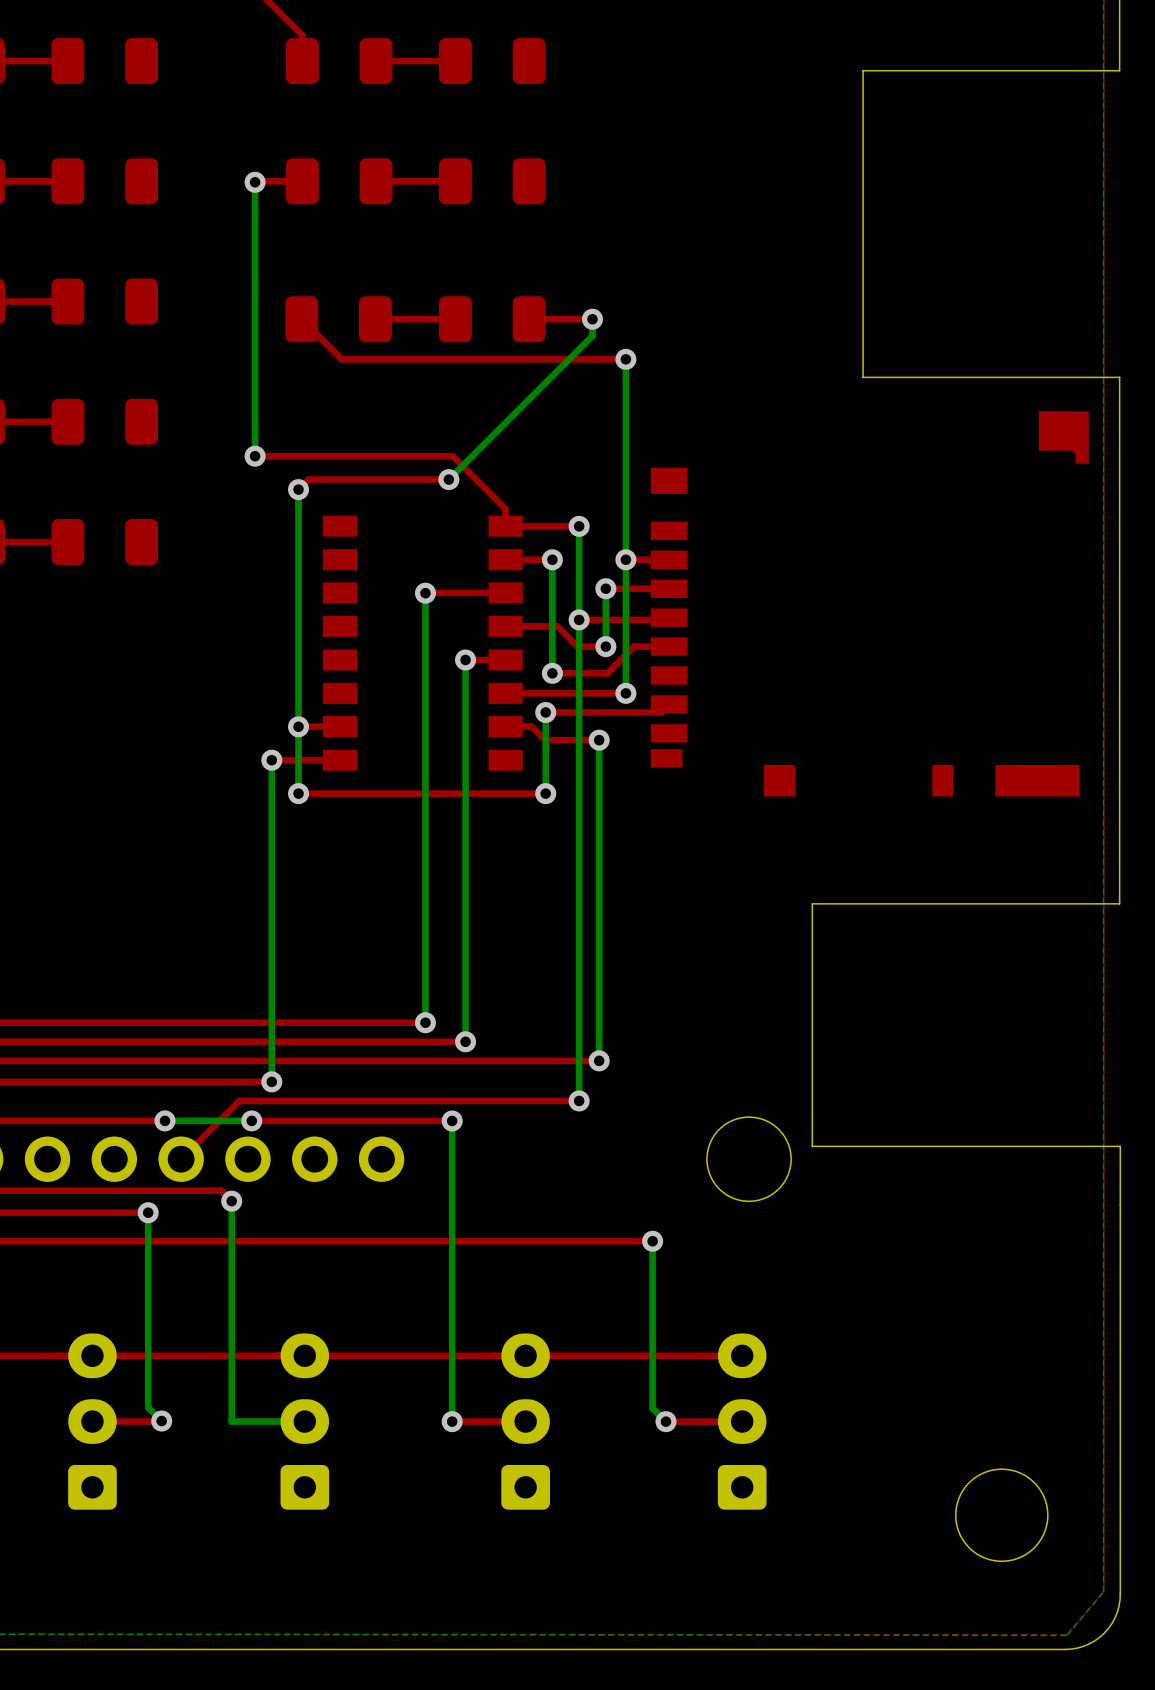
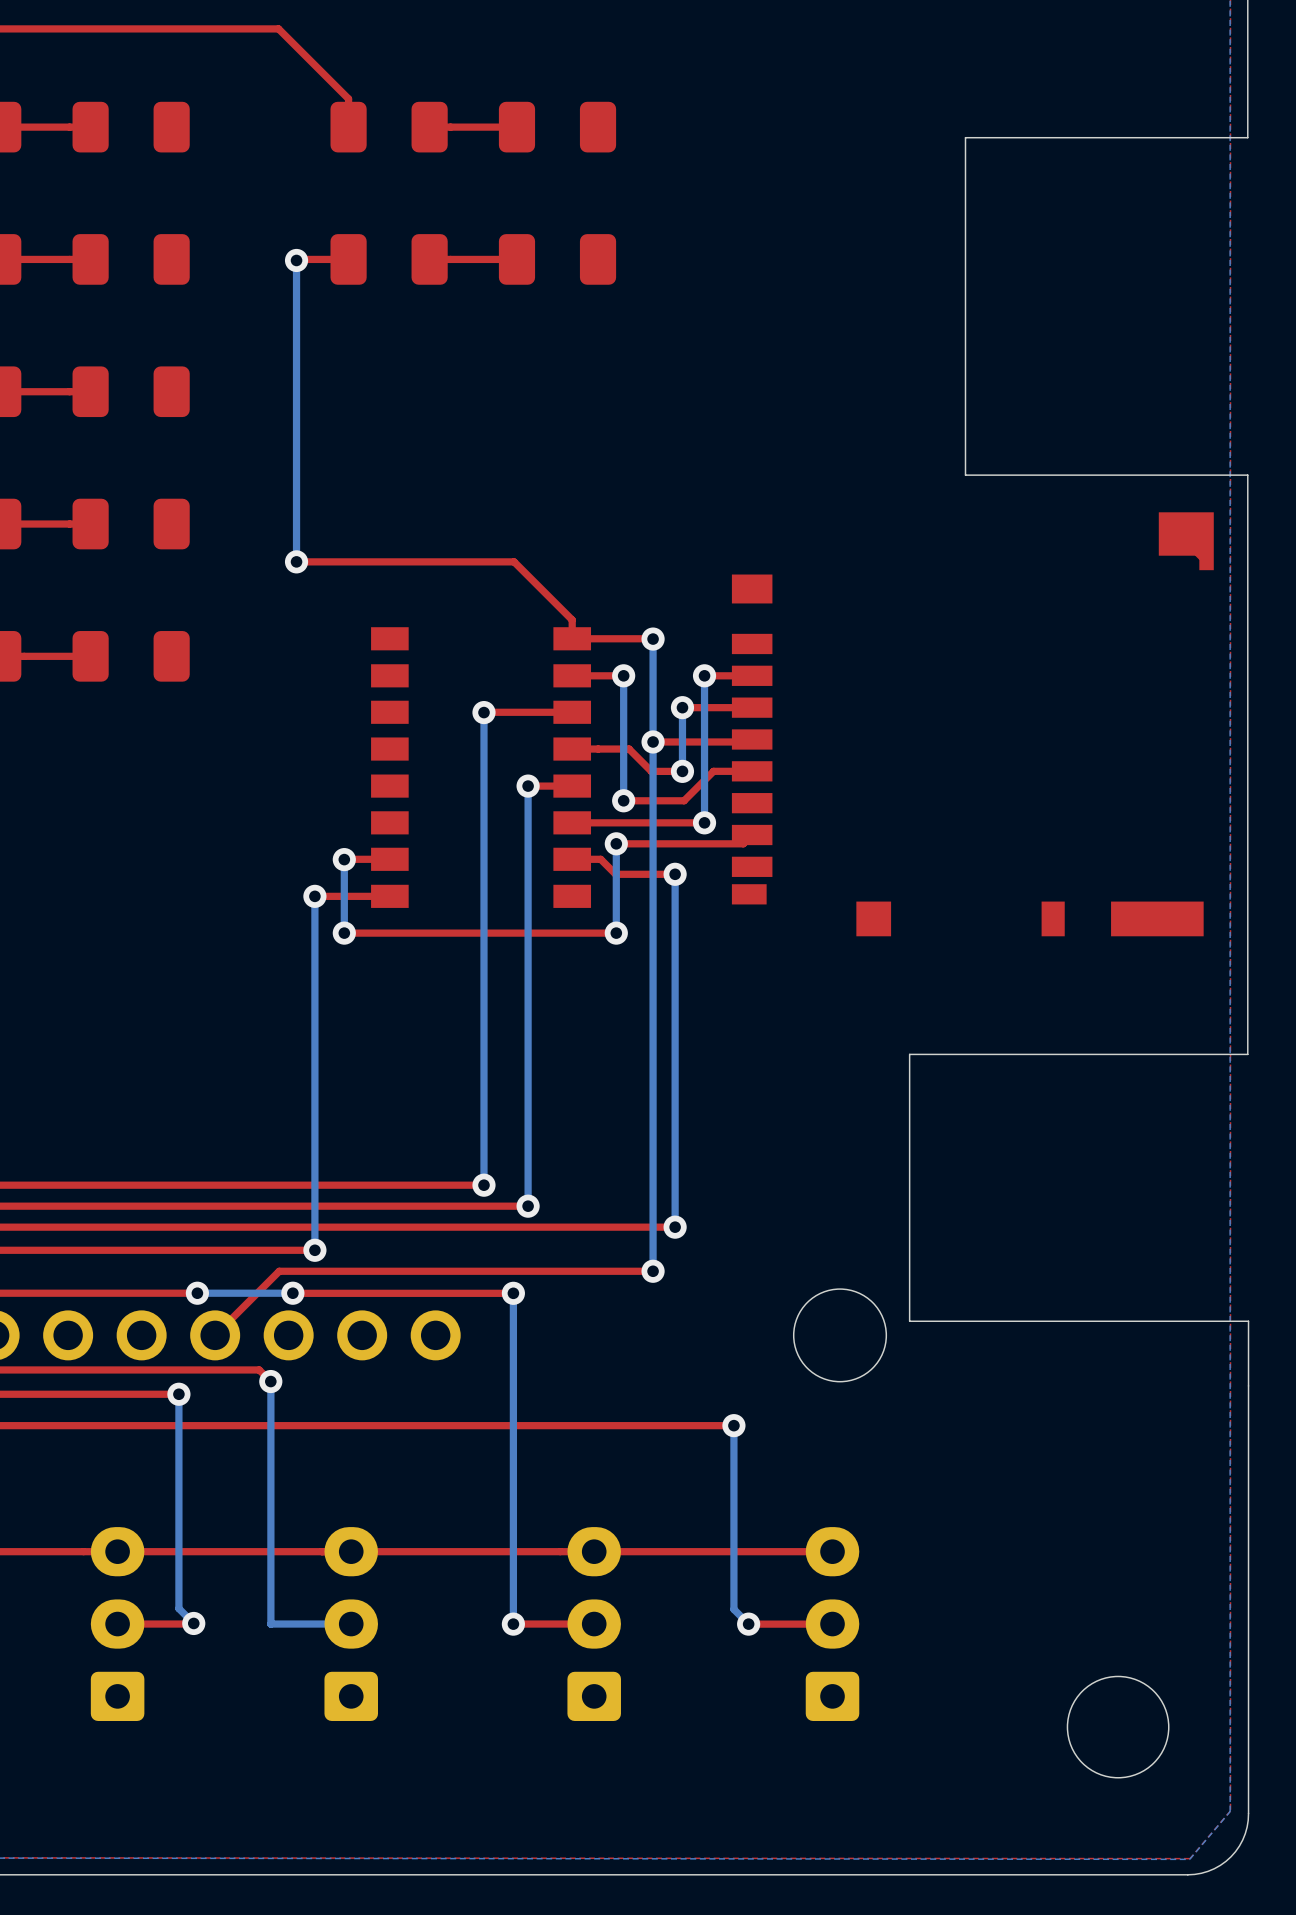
top track: (301, 319) (341, 359) (625, 359) -> none
part: (338, 319) -> none
top track: (455, 319) (375, 319) -> none
part: (492, 319) -> none
top track: (592, 319) (529, 319) -> none
bottom track: (592, 319) (592, 335) (448, 479) -> none
via: (592, 319) -> none
bottom track: (625, 359) (625, 559) -> none
via: (625, 359) -> none
top track: (448, 479) (308, 479) (298, 489) -> none
via: (448, 479) -> none
bottom track: (298, 489) (298, 726) -> none
via: (298, 489) -> none

